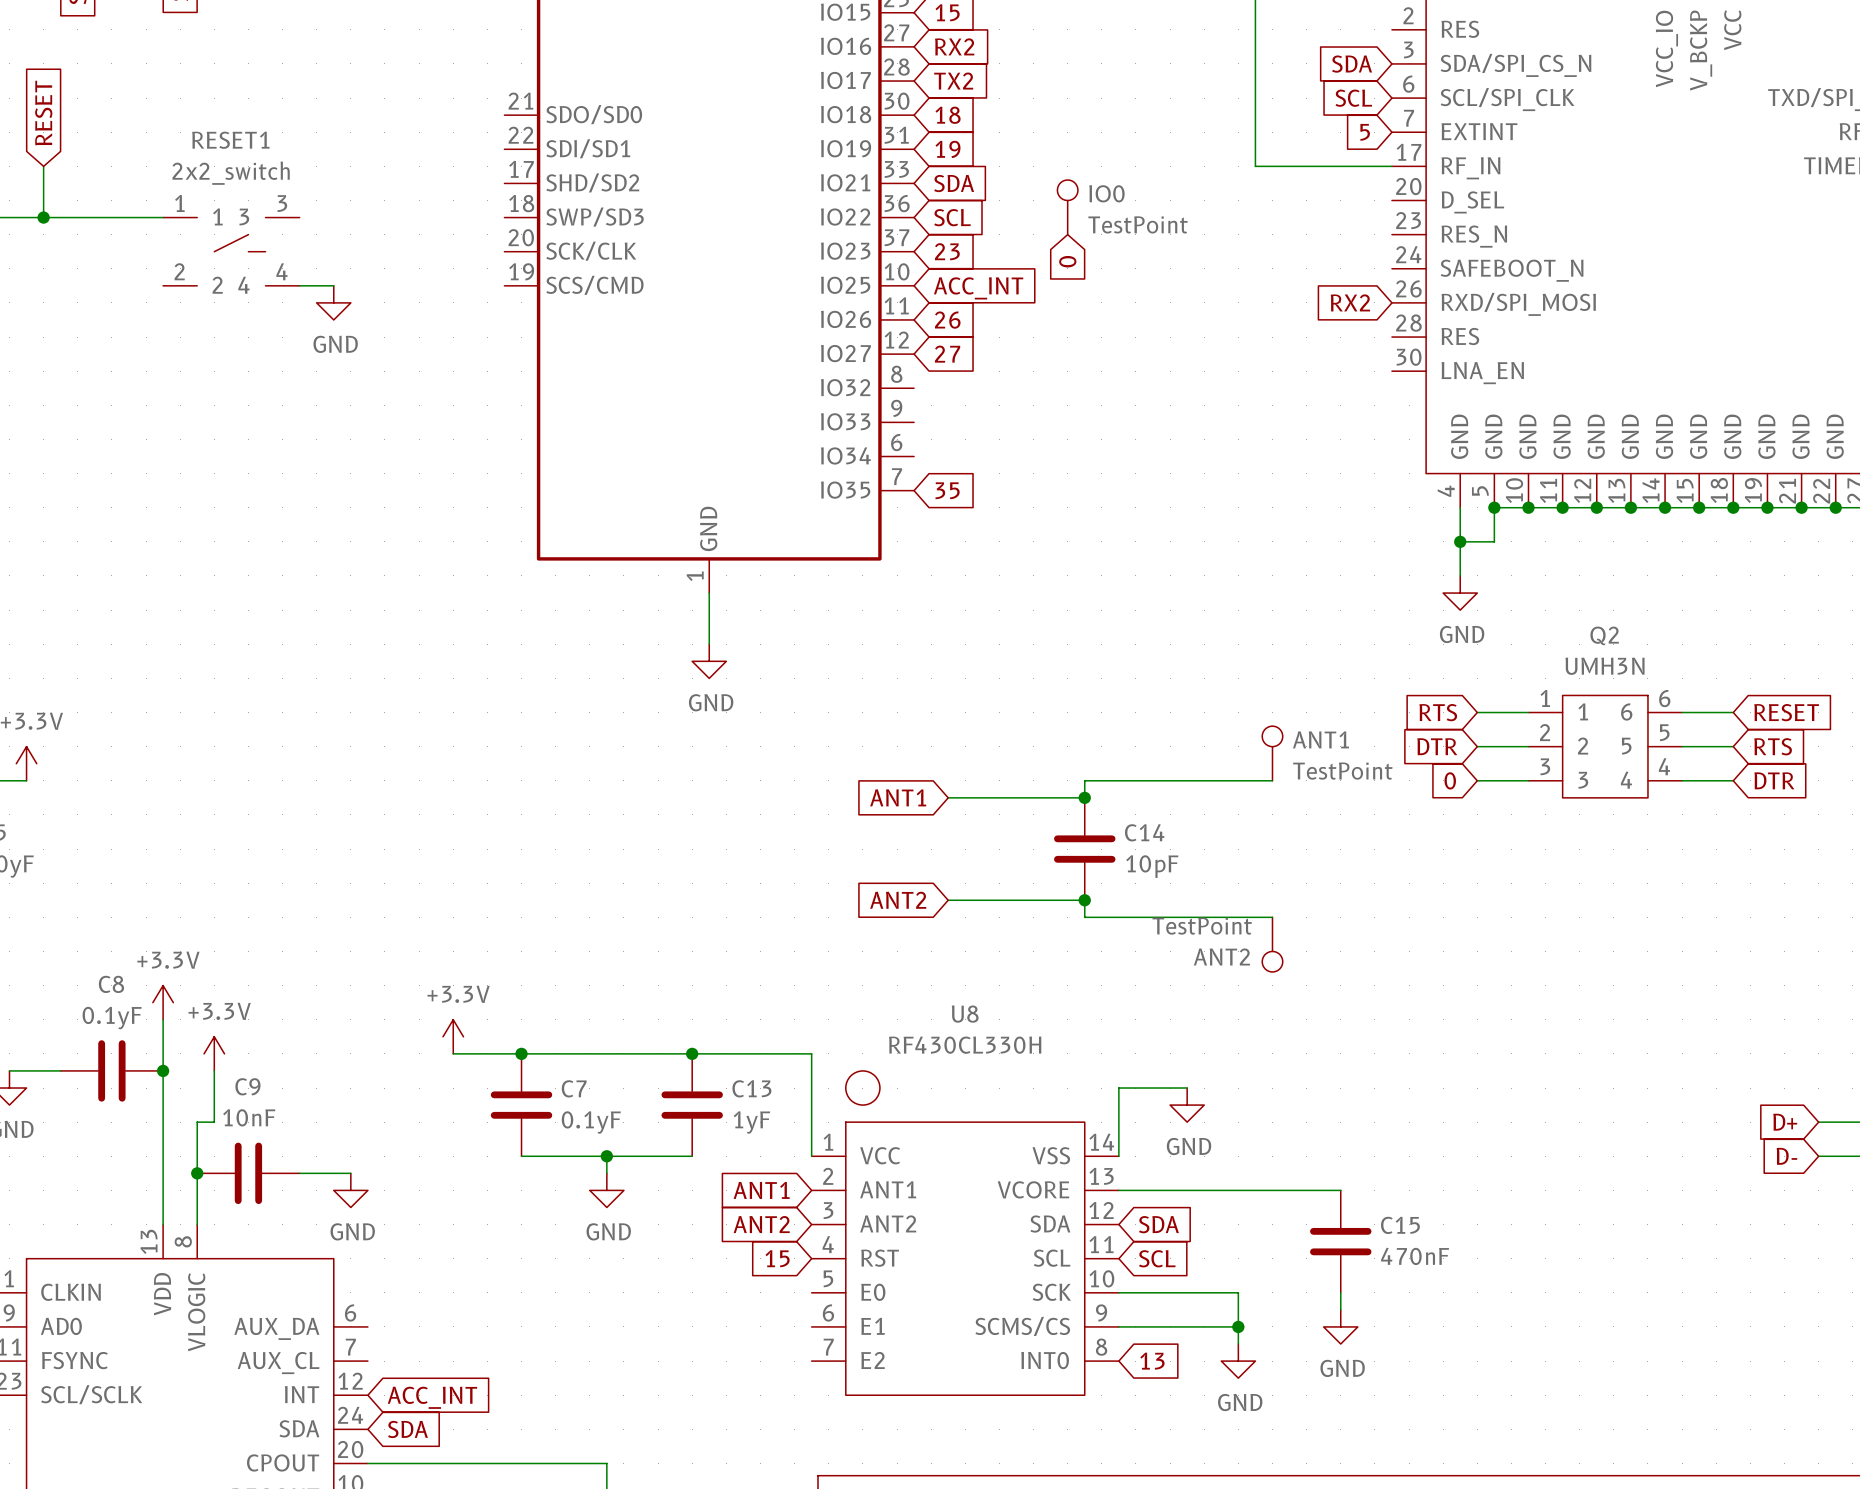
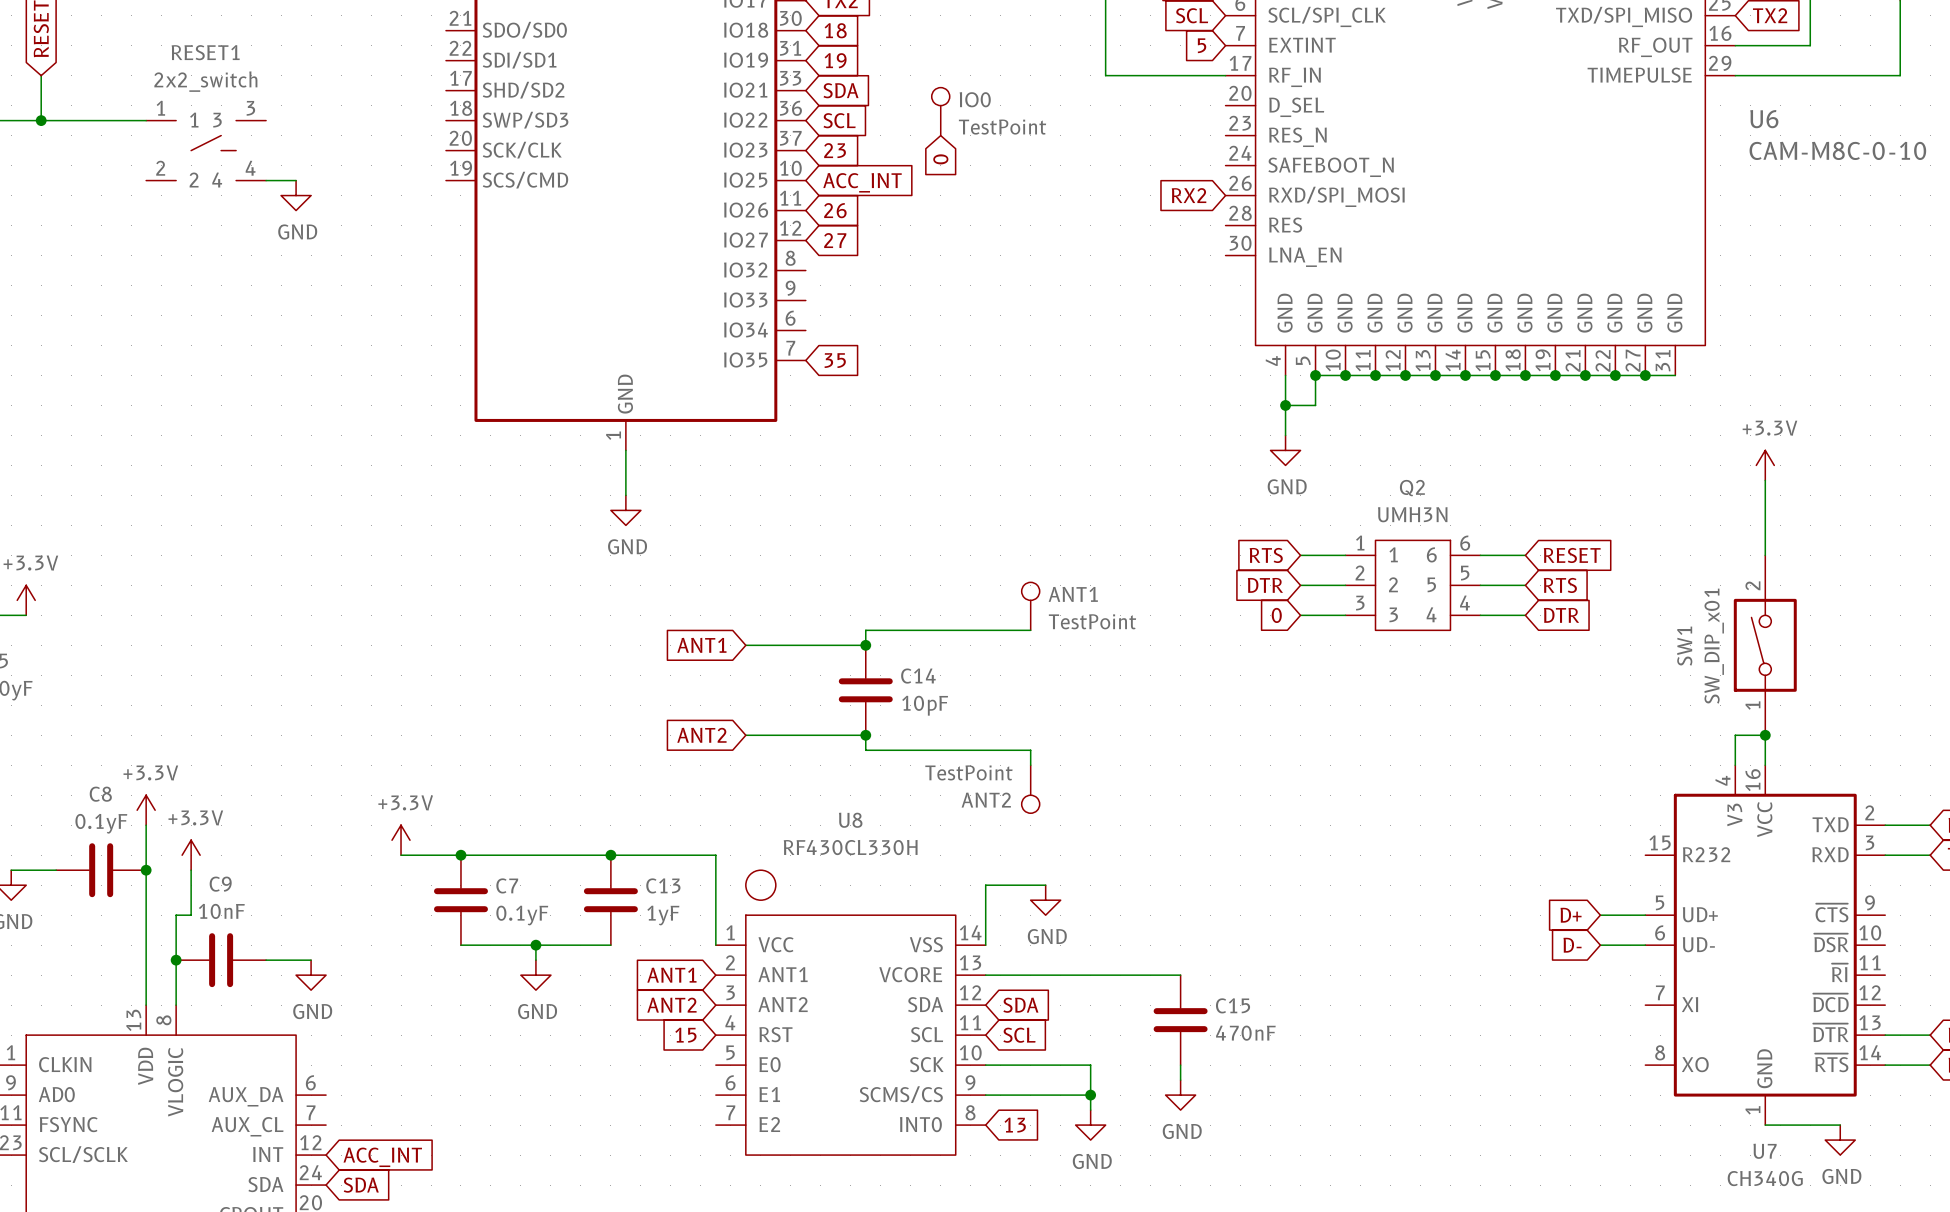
ANT1 position: (1272, 753) -> (1030, 606)
wire: (1272, 780) (1084, 780) (1084, 797) -> (1030, 630) (955, 630)
global label position: ANT1 (898, 797) -> ANT1 (701, 645)
wire: (948, 797) (982, 797) -> (745, 645) (865, 645) (865, 630)
junction: (1084, 797) -> none
junction: none -> (865, 645)
C14 position: (1084, 849) -> (865, 690)
global label position: ANT2 (898, 900) -> ANT2 (701, 735)
wire: (948, 900) (1084, 900) (1084, 917) (1272, 917) -> none
junction: (1084, 900) -> none
wire: none -> (745, 735) (865, 735) (865, 750) (1030, 750) (1030, 765)
junction: none -> (865, 735)
ANT2 position: (1272, 944) -> (1030, 789)

